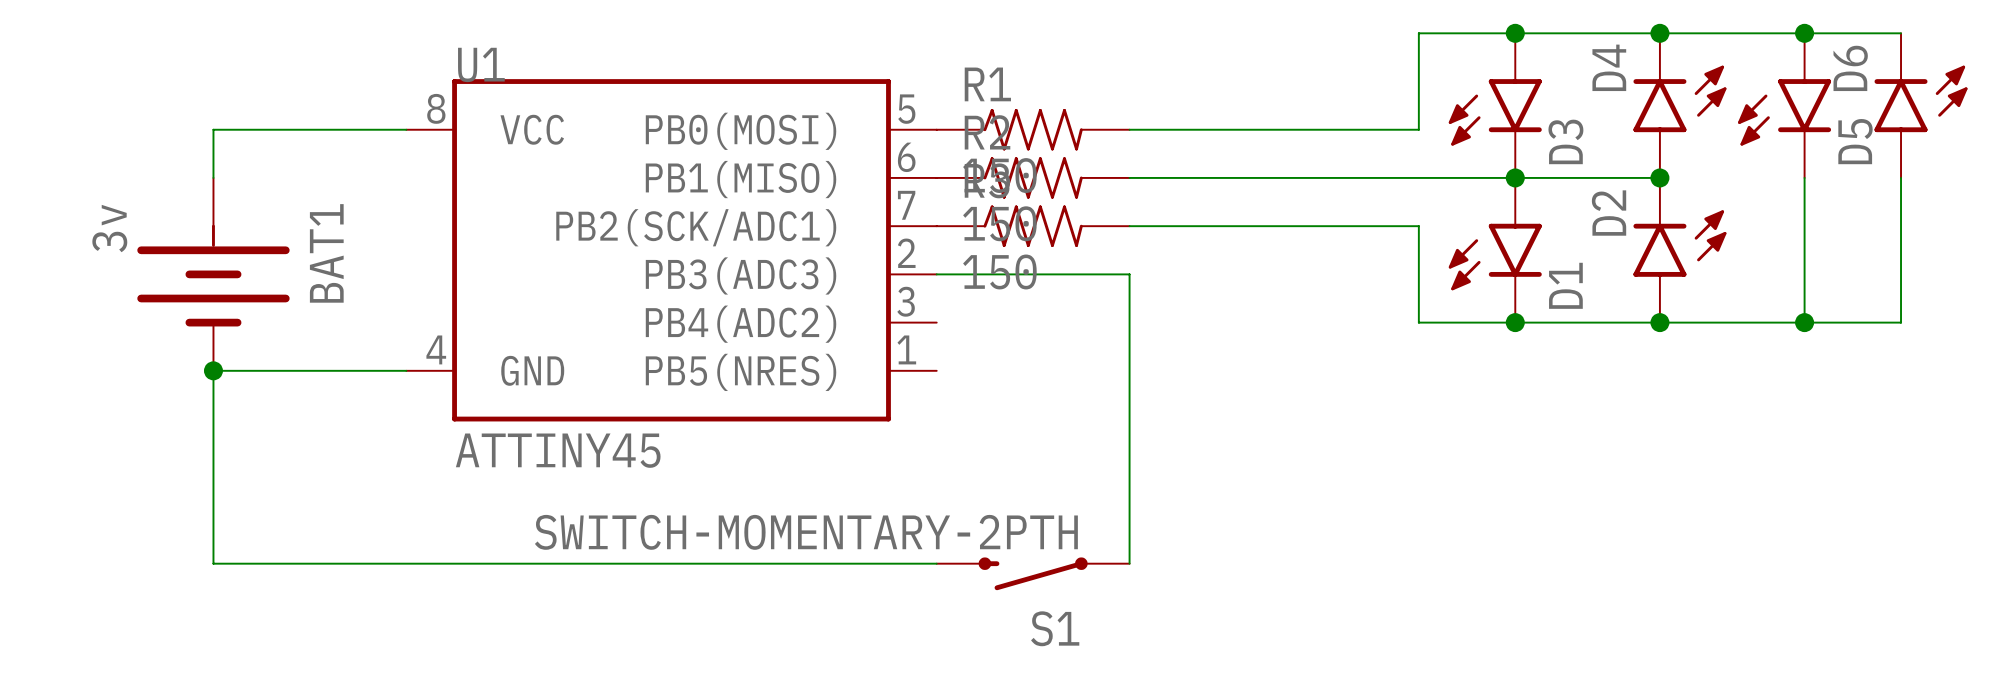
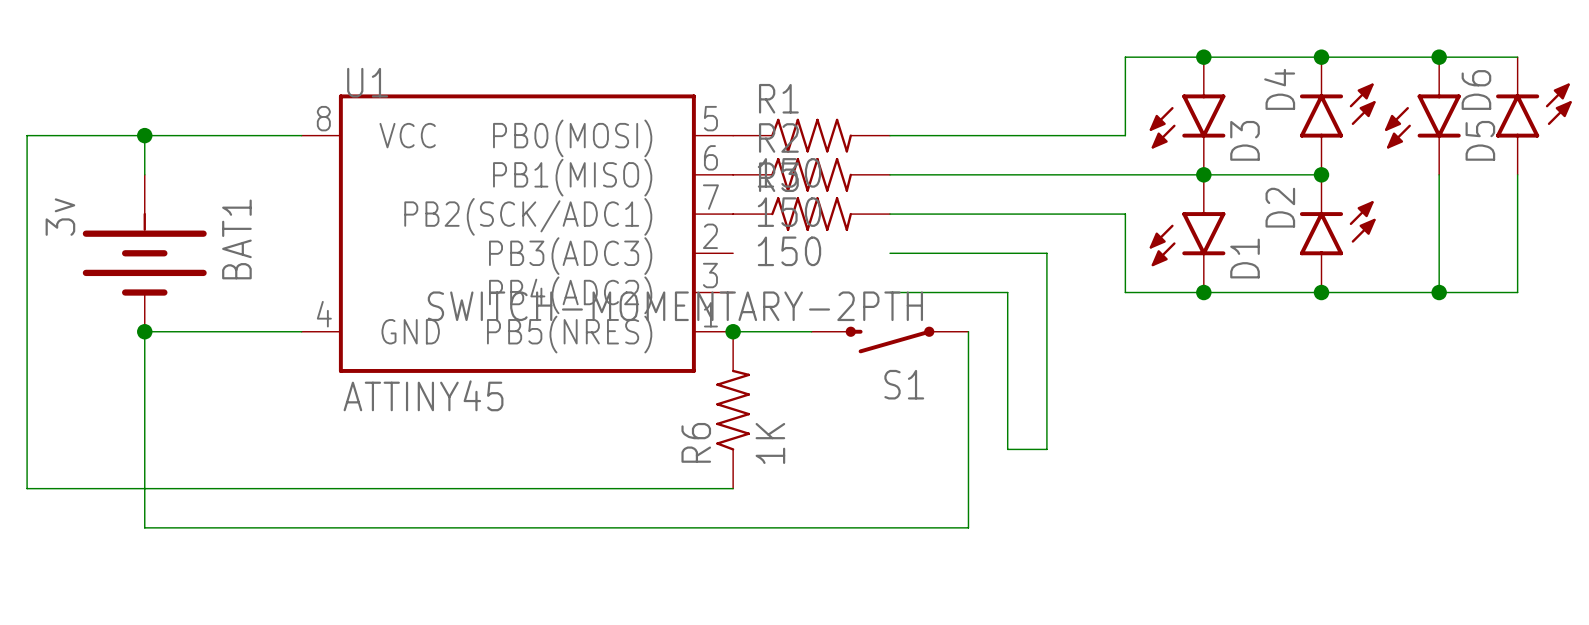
wire: none -> (144, 135) (27, 135) (27, 488) (144, 488) (144, 527) (968, 527) (968, 331)
junction: none -> (144, 135)
wire: (936, 274) (1129, 274) (1129, 563) -> none
wire: none -> (890, 253) (1046, 253) (1046, 449) (1007, 449) (1007, 292) (890, 292)
wire: none -> (733, 331) (811, 331)
junction: none -> (733, 331)
R6: none -> 1K (733, 410)
S1 position: (1033, 573) -> (890, 339)

